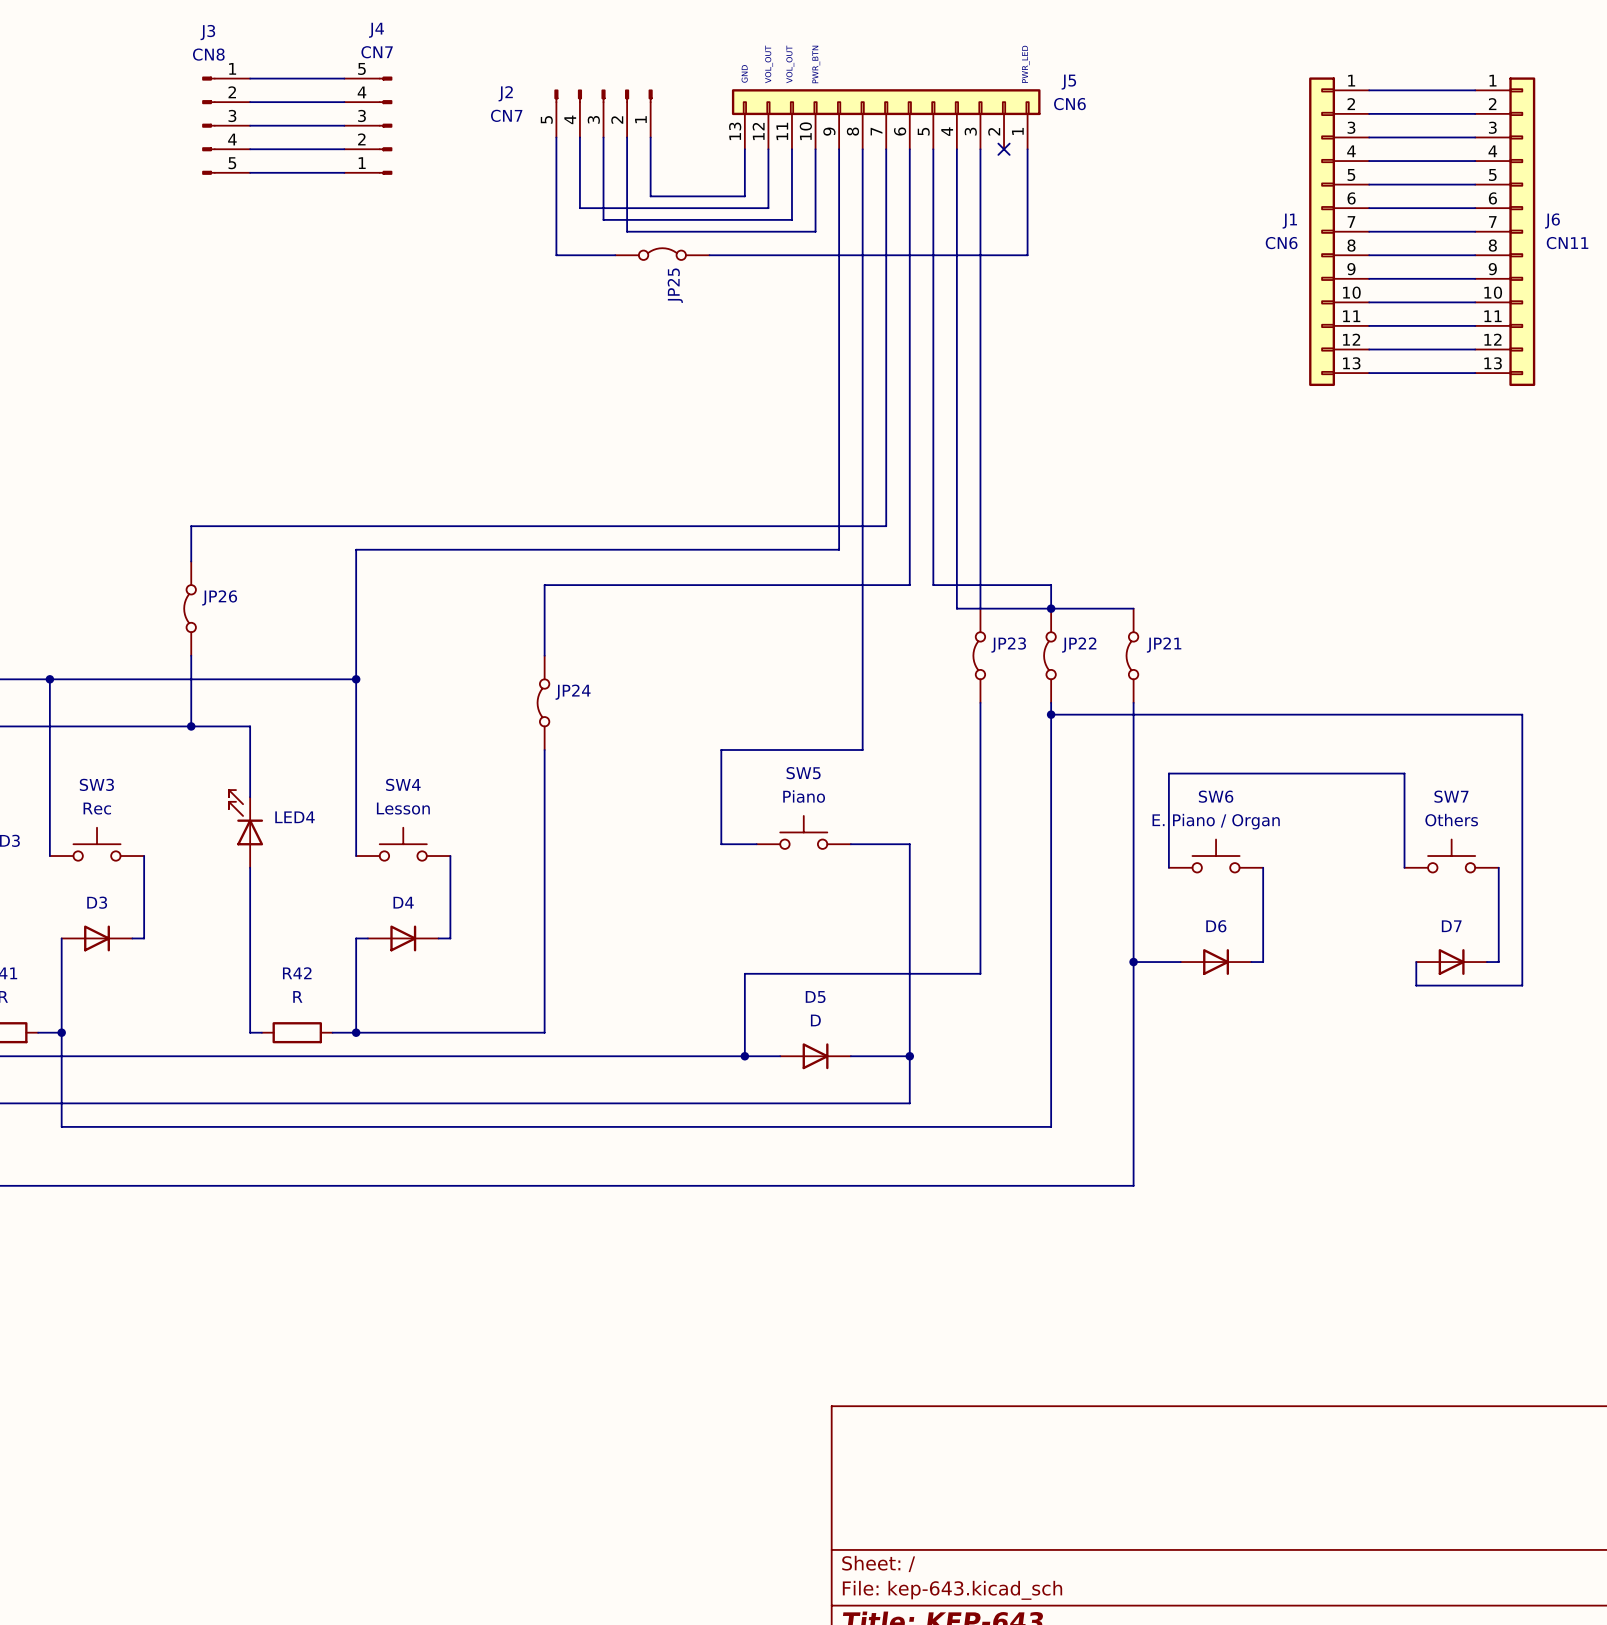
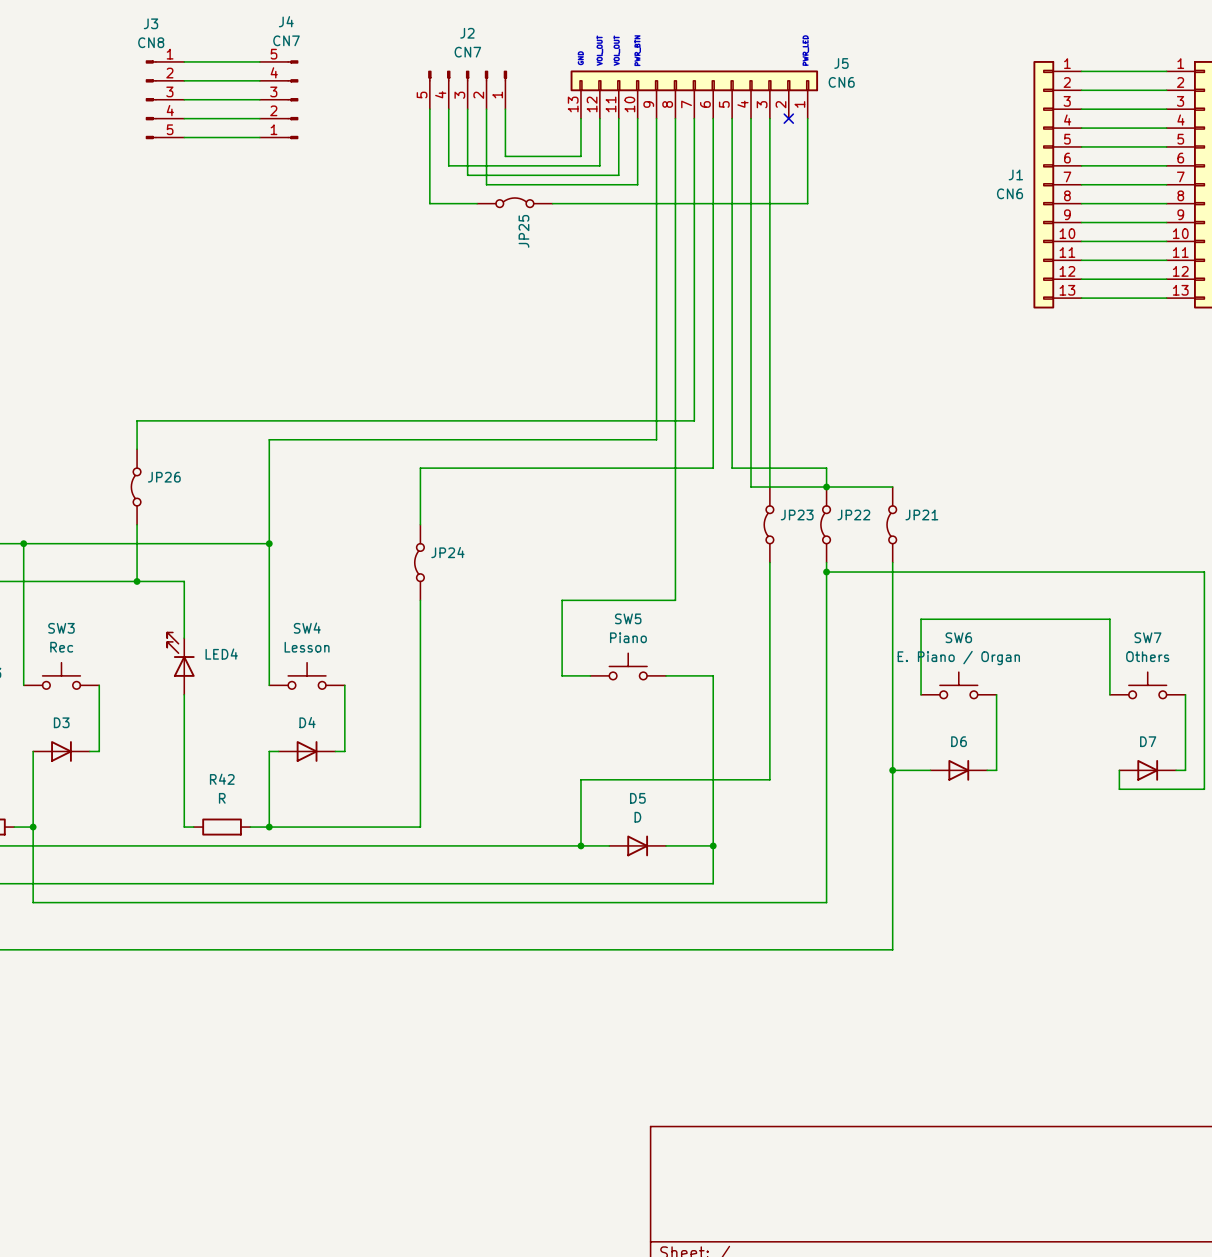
J2 name position: J2 (505, 93) -> J2 (467, 33)
J2 value position: CN7 (506, 115) -> CN7 (467, 52)

